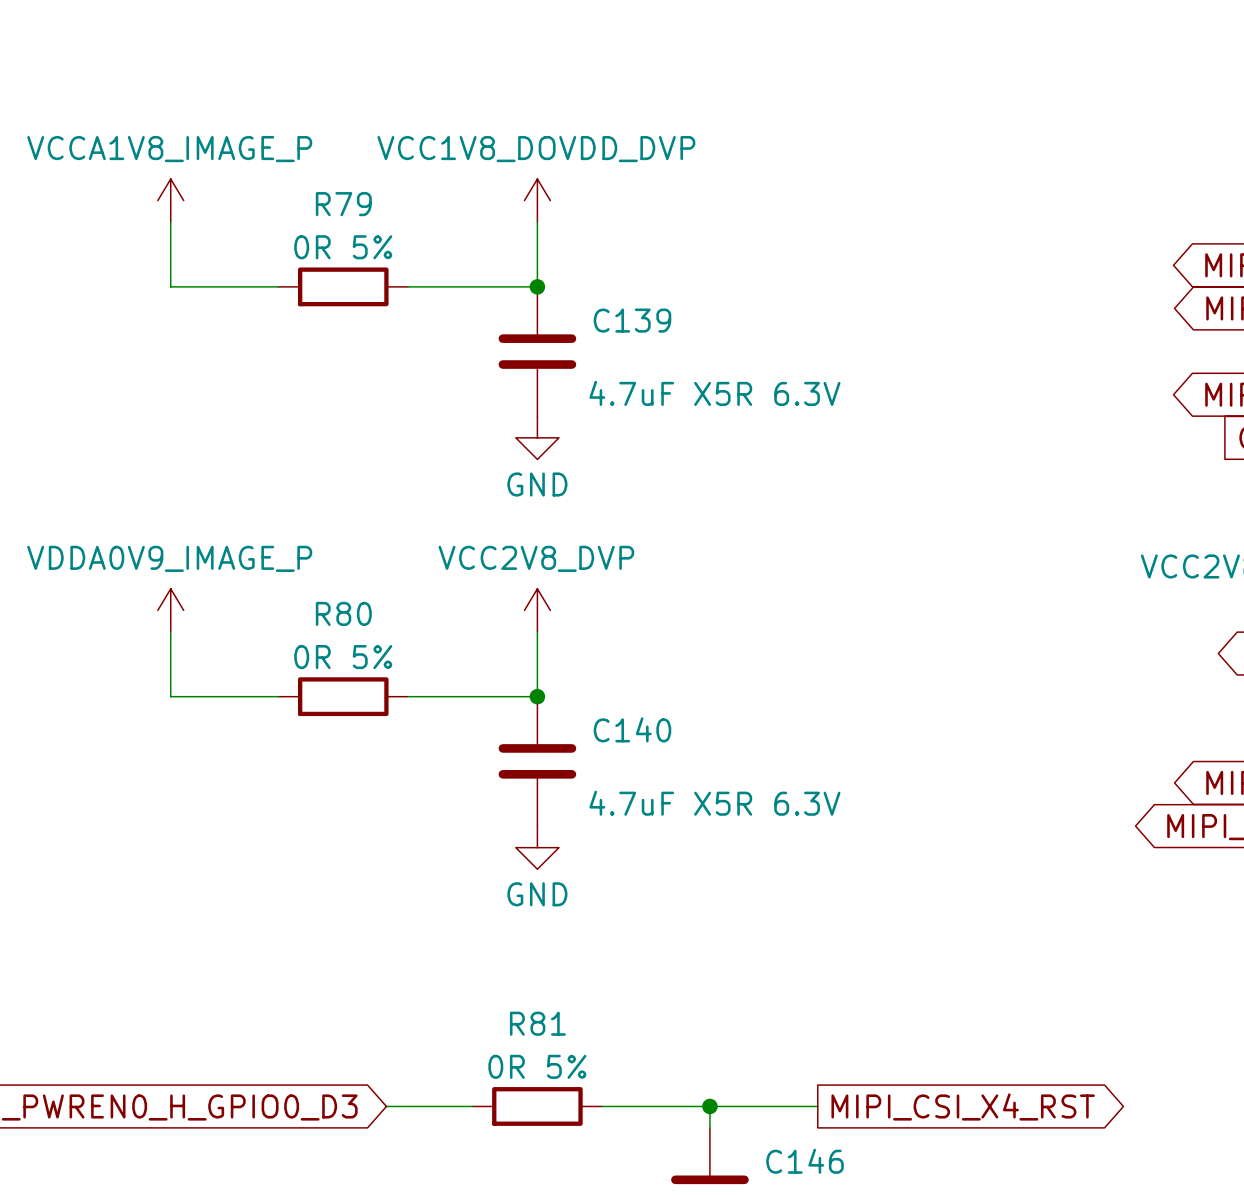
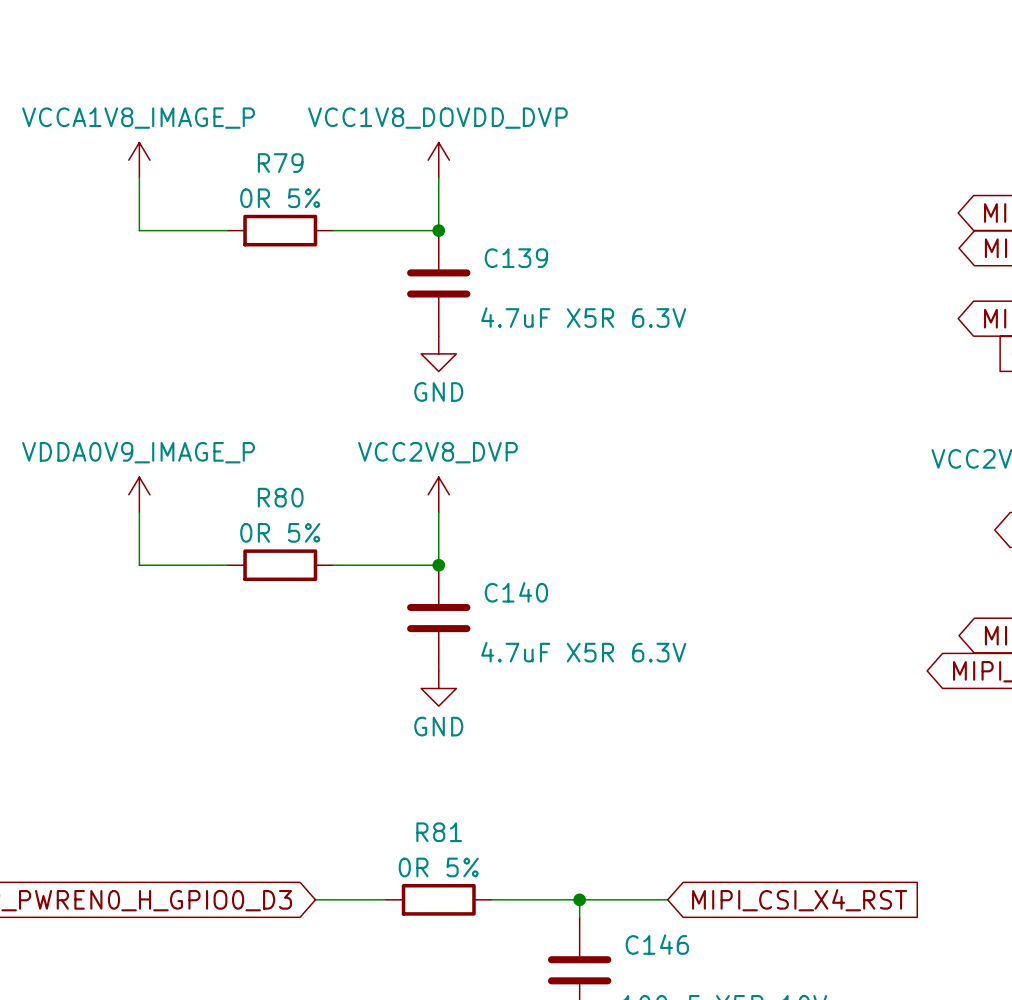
global label shape: output (963, 1106) -> input (799, 900)

